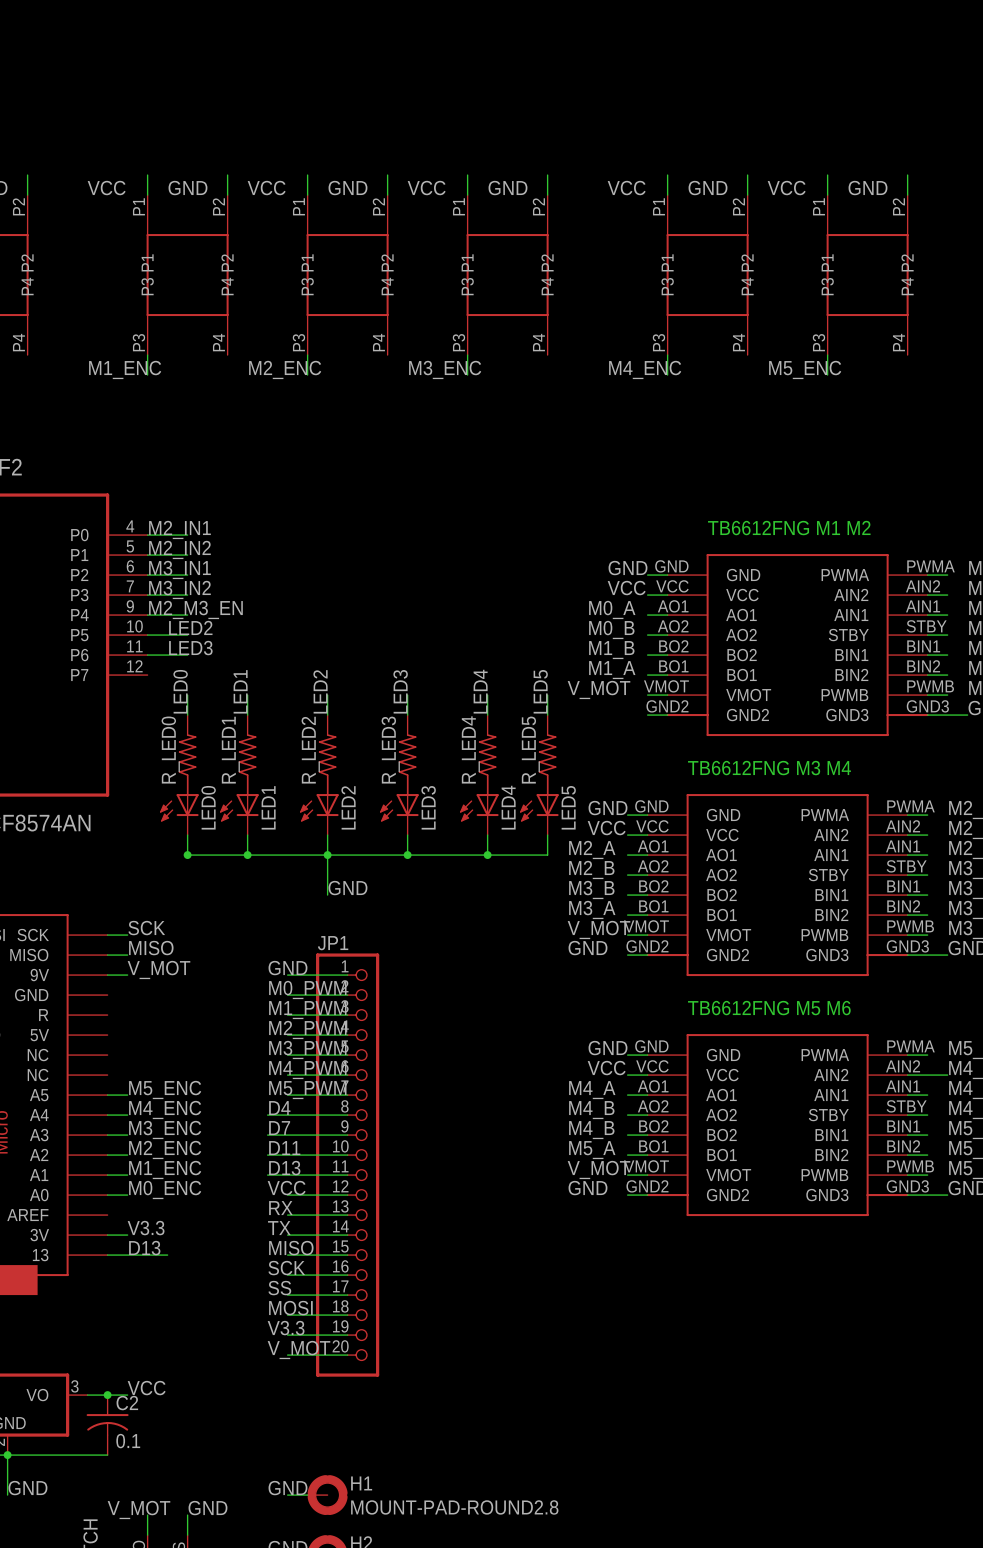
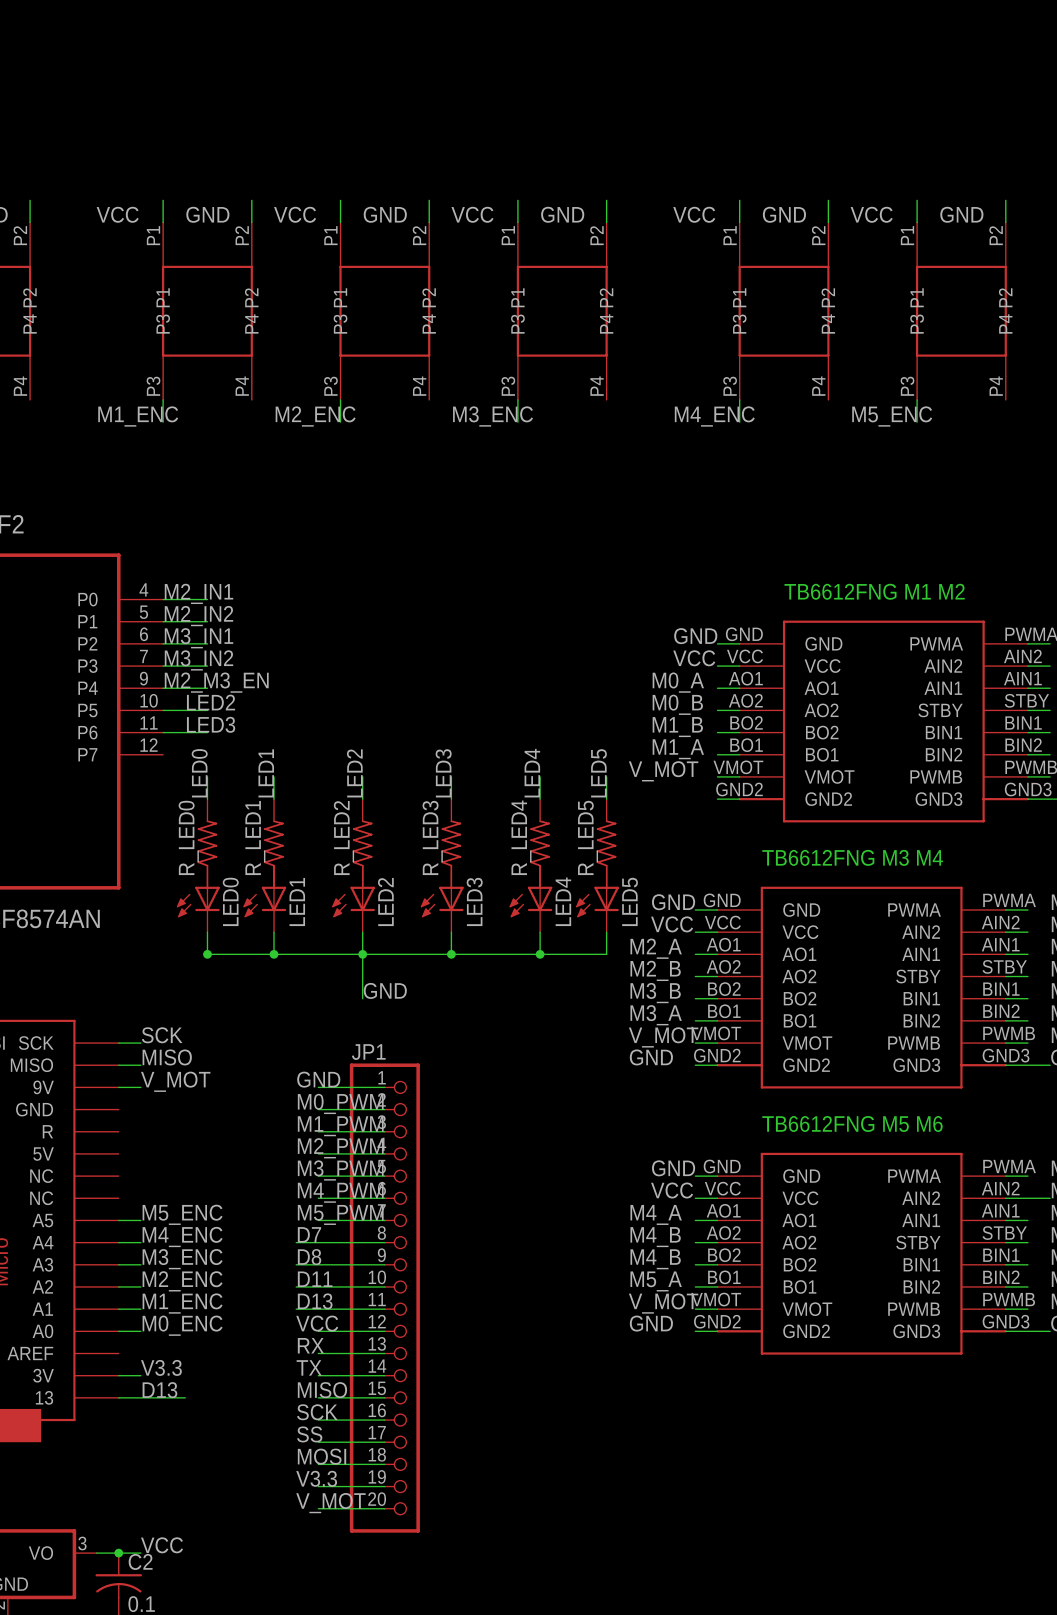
label: D4 (279, 1108) -> D7 (309, 1234)
label: D7 (279, 1128) -> D8 (309, 1257)

